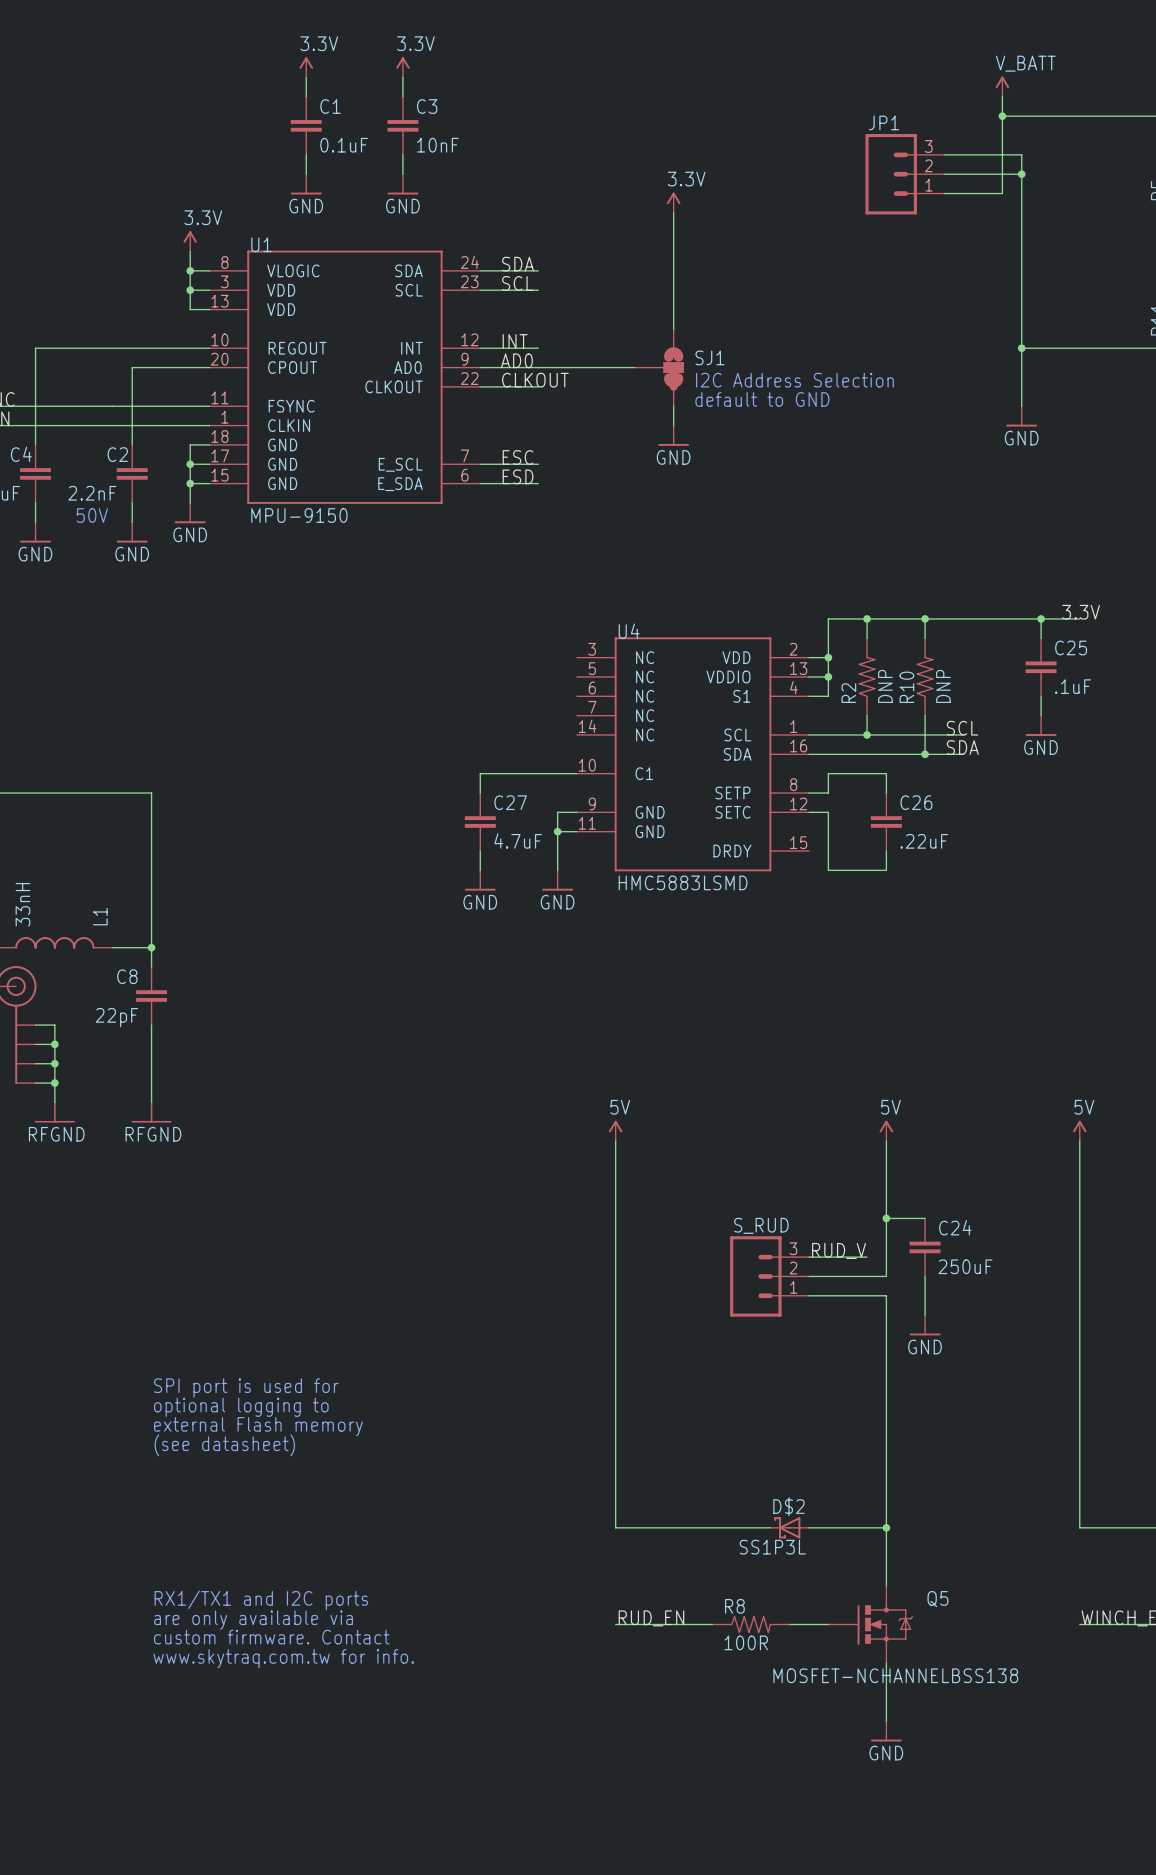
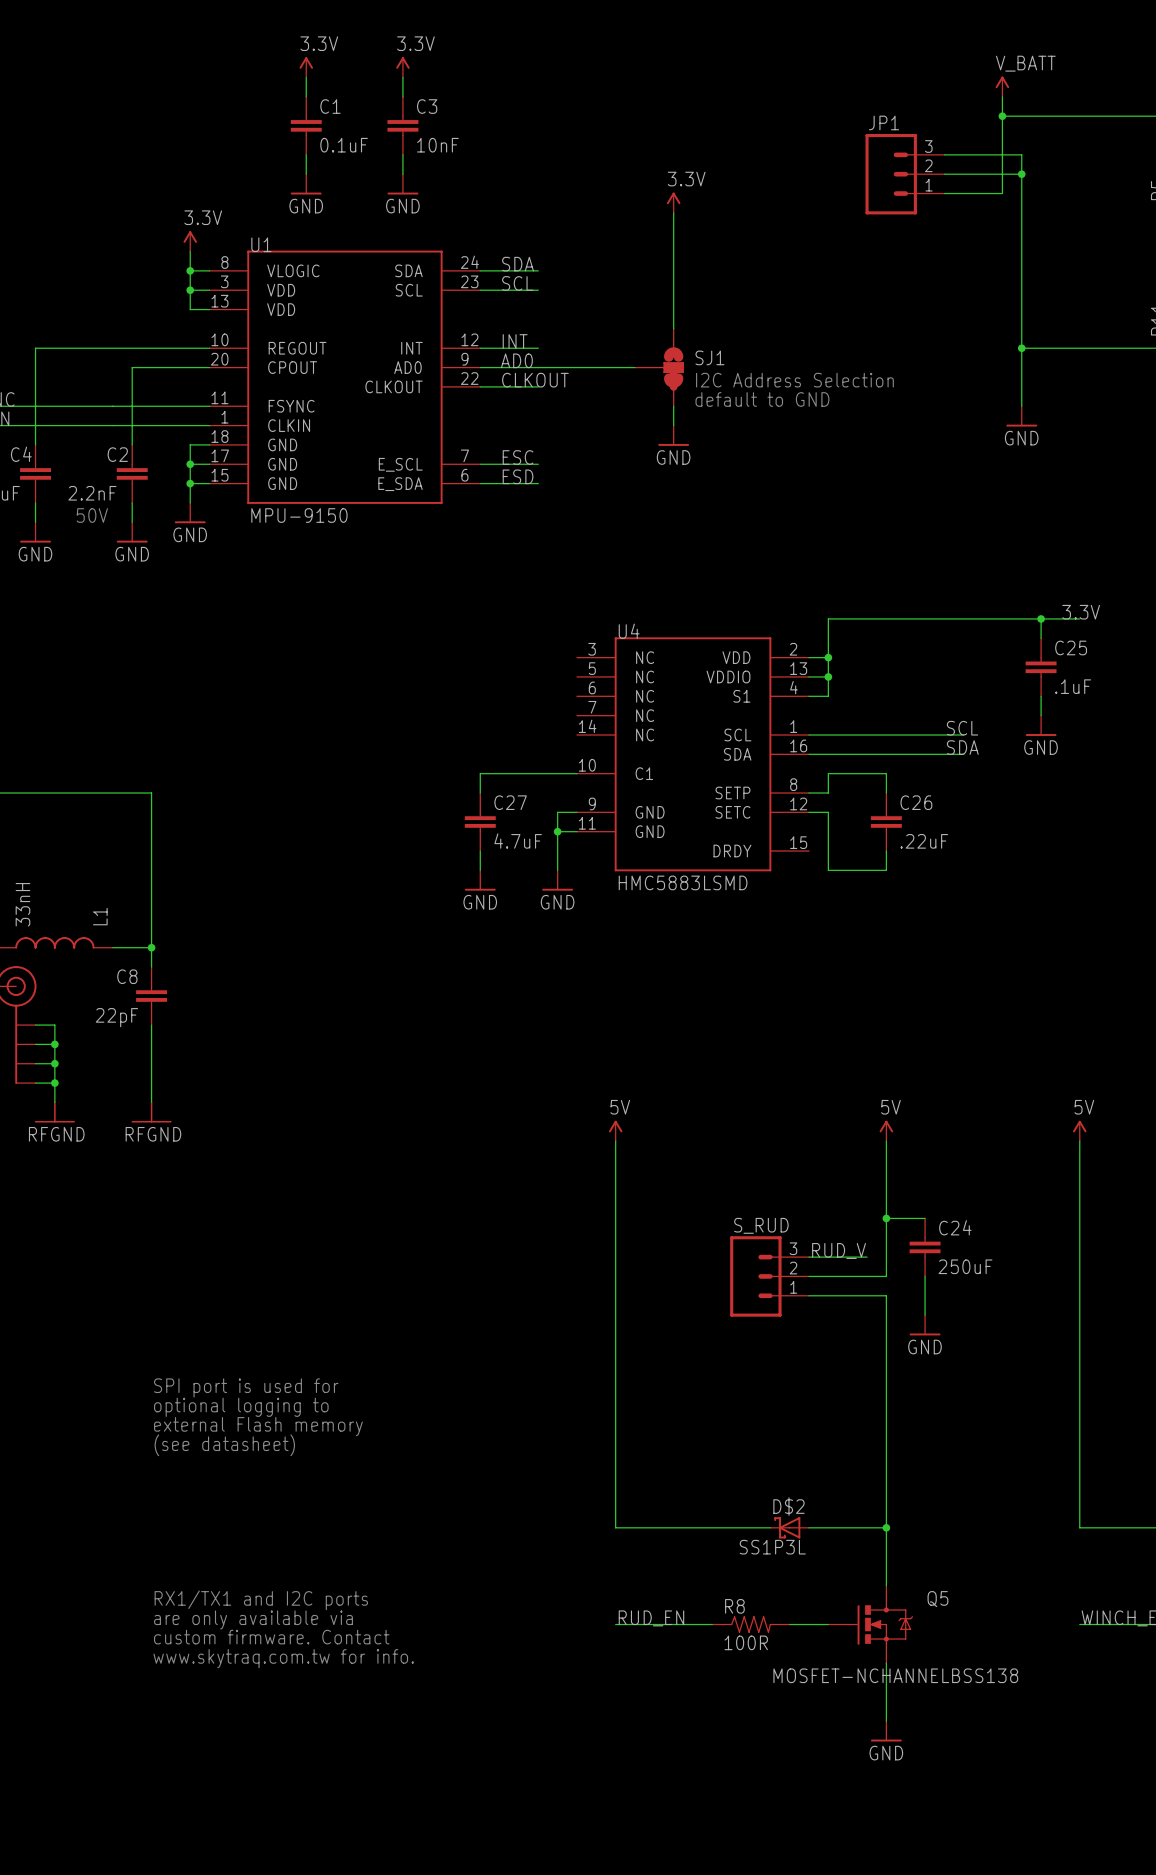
wire: (867, 618) (867, 638) -> none
junction: (867, 618) -> none
wire: (925, 618) (925, 638) -> none
junction: (925, 618) -> none
R2: DNP (867, 676) -> none
R10: DNP (925, 676) -> none
wire: (867, 715) (867, 734) -> none
wire: (925, 715) (925, 754) -> none
junction: (867, 734) -> none
junction: (925, 754) -> none

